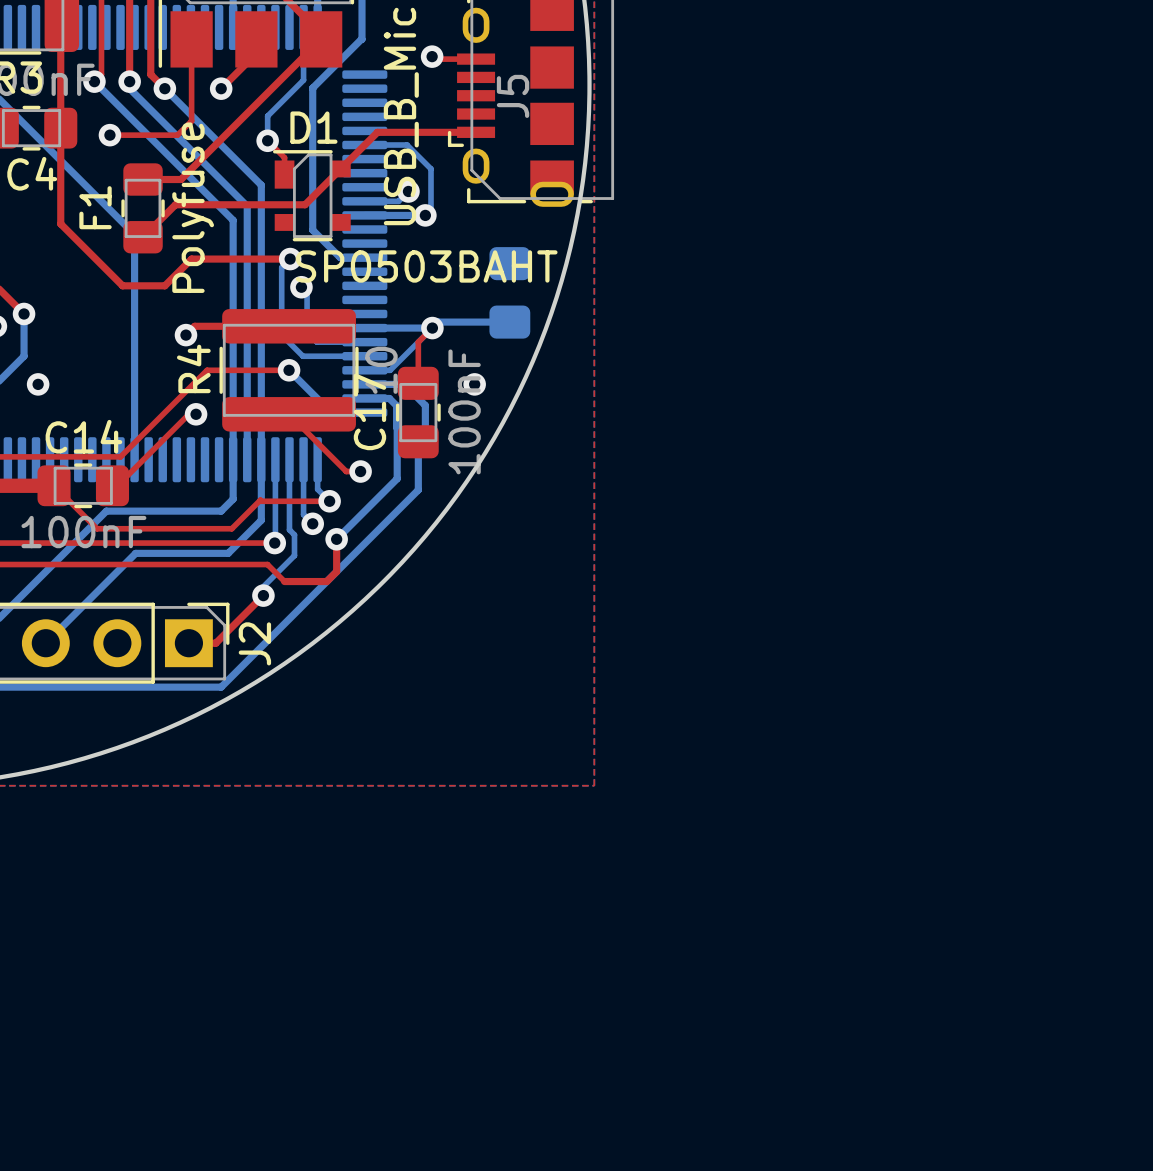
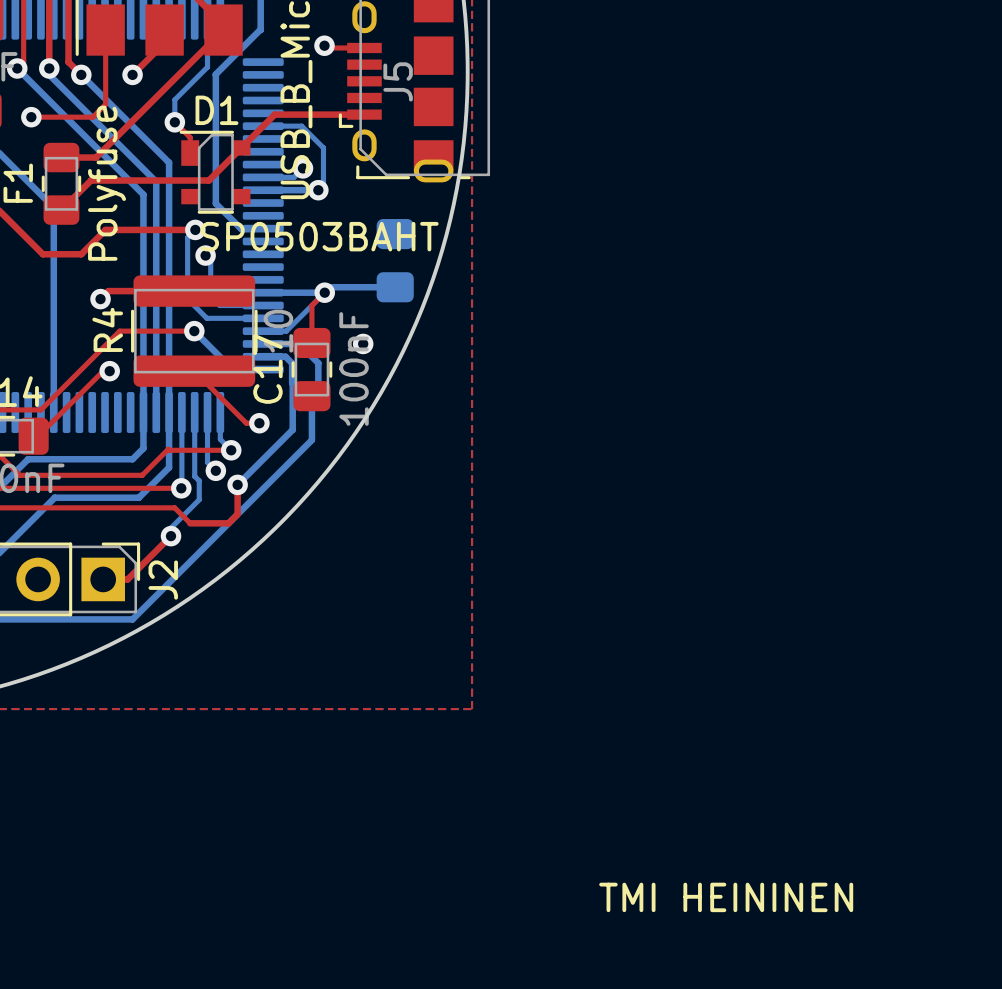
text: none -> TMI HEININEN (726, 897)

